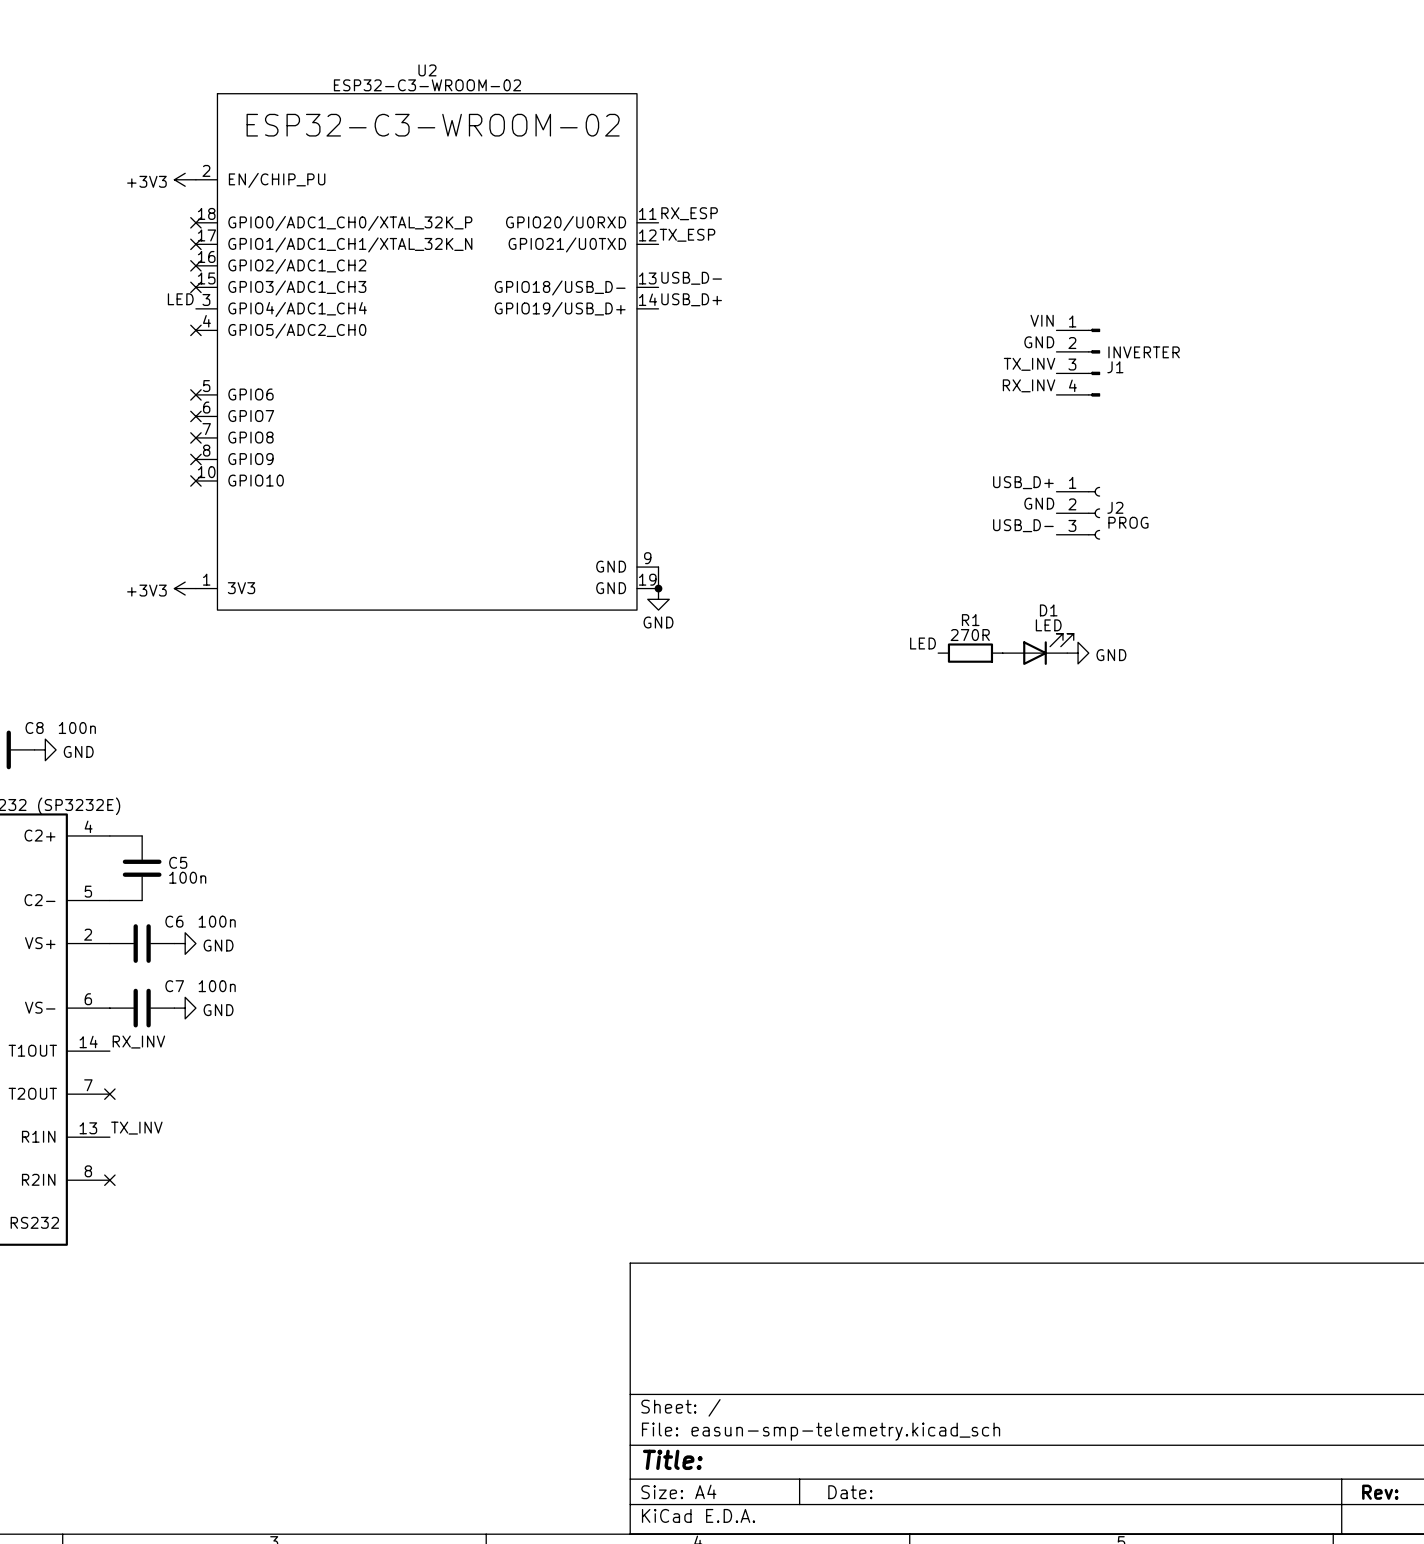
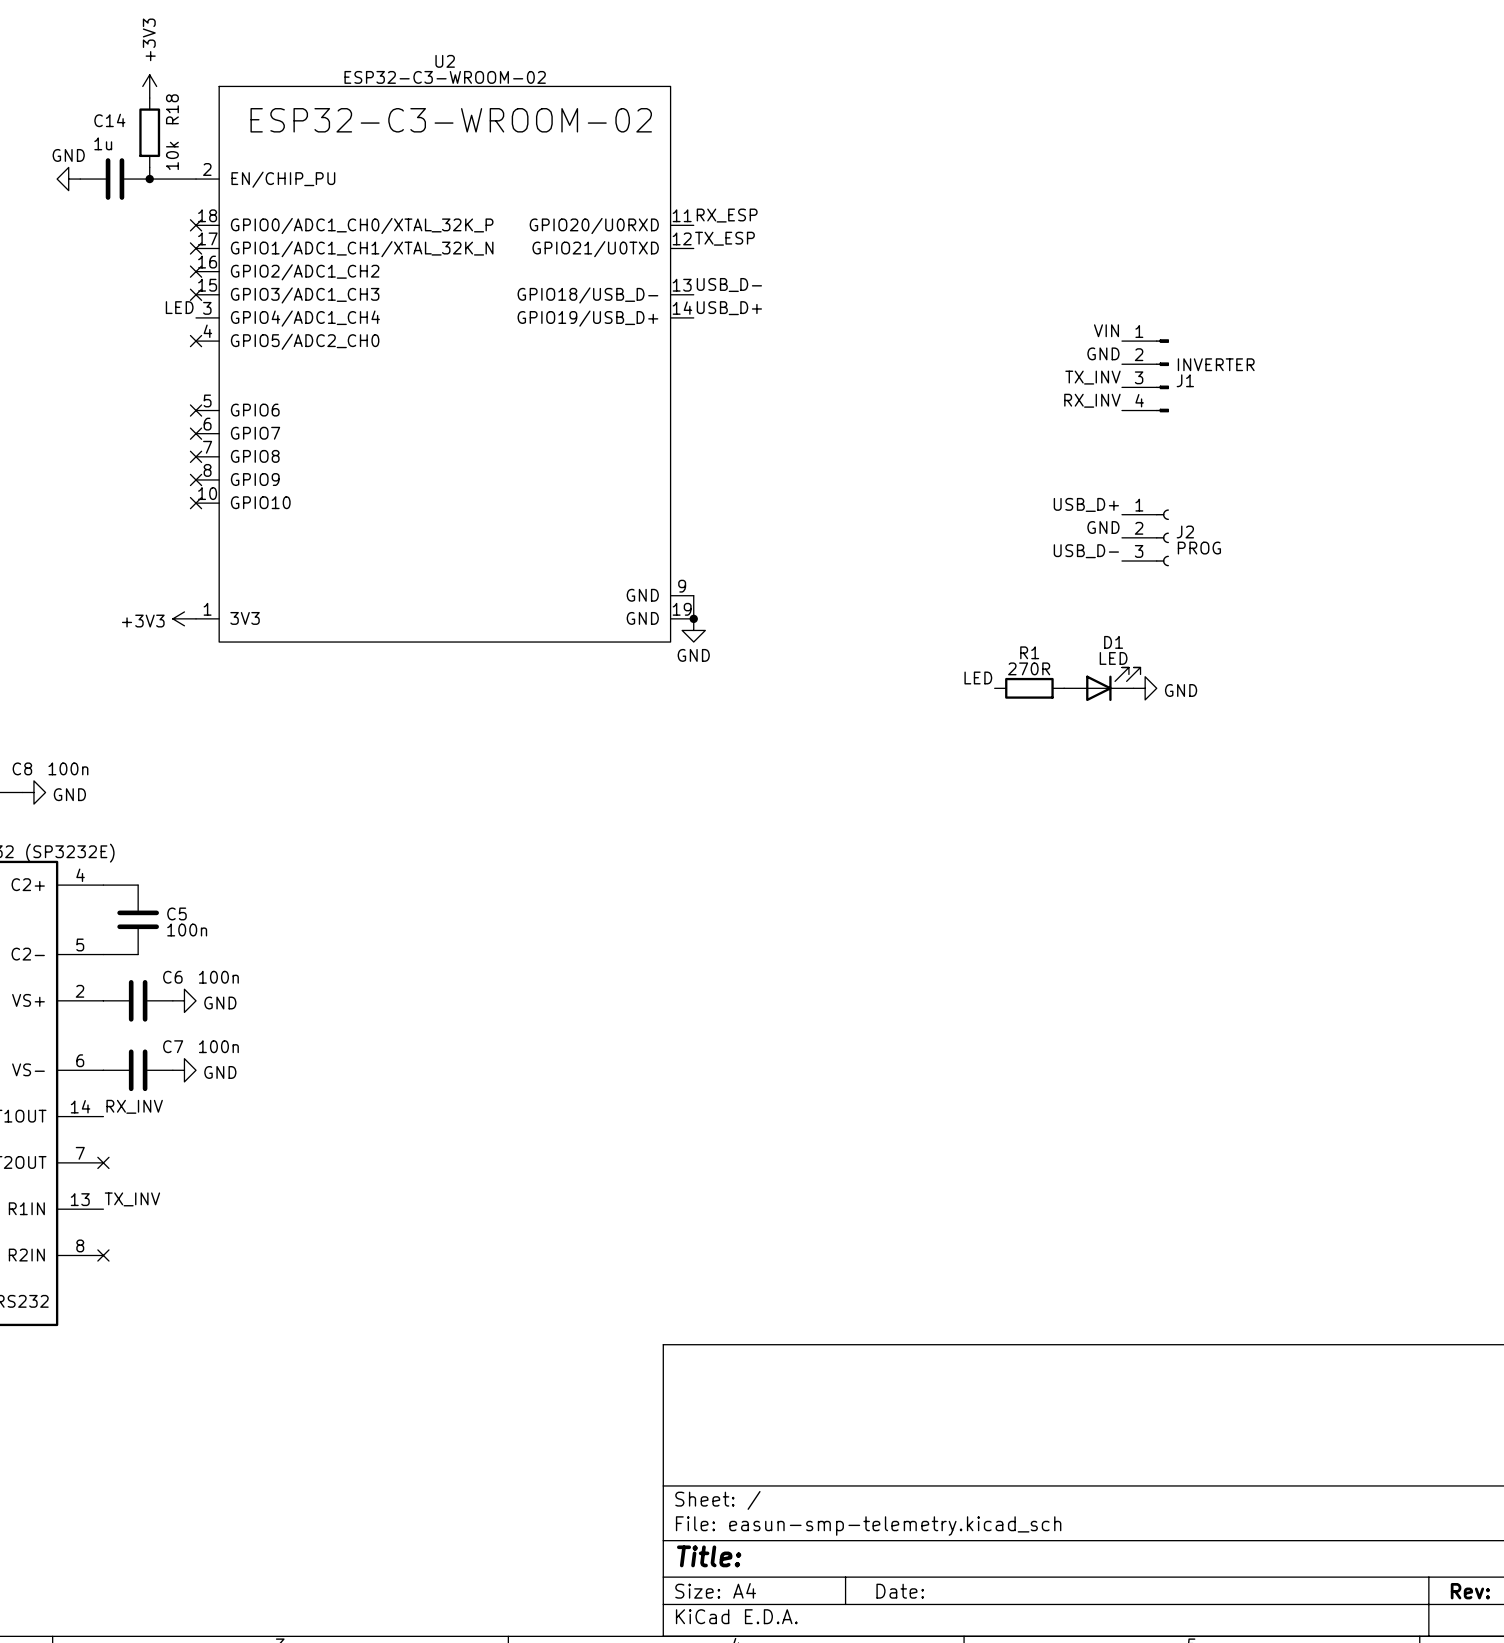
R18: none -> 10k (149, 132)
wire: none -> (149, 167) (149, 179) (196, 179)
power symbol: none -> GND (68, 179)
C14: none -> 1u (114, 179)
junction: none -> (149, 179)
power symbol rotation: 0° (185, 179) -> 90° clockwise (149, 86)
power symbol position: +3V3 (185, 179) -> +3V3 (149, 86)

